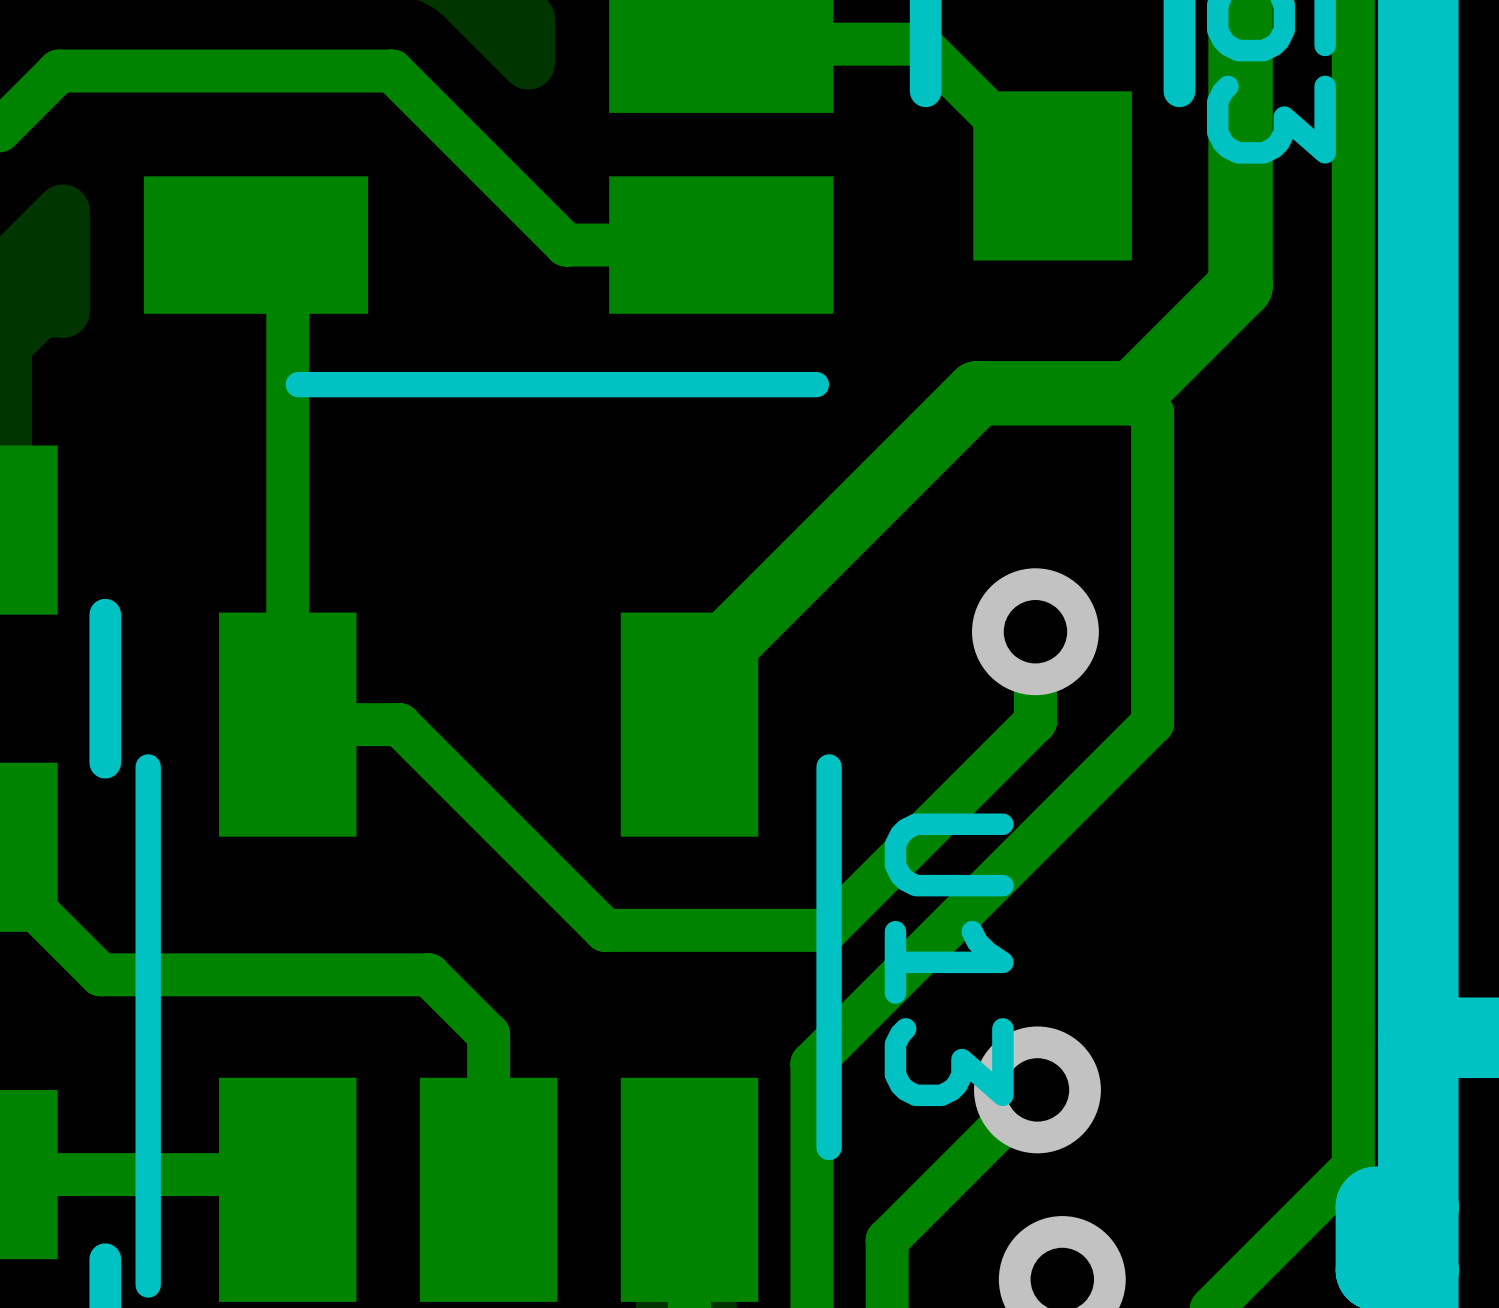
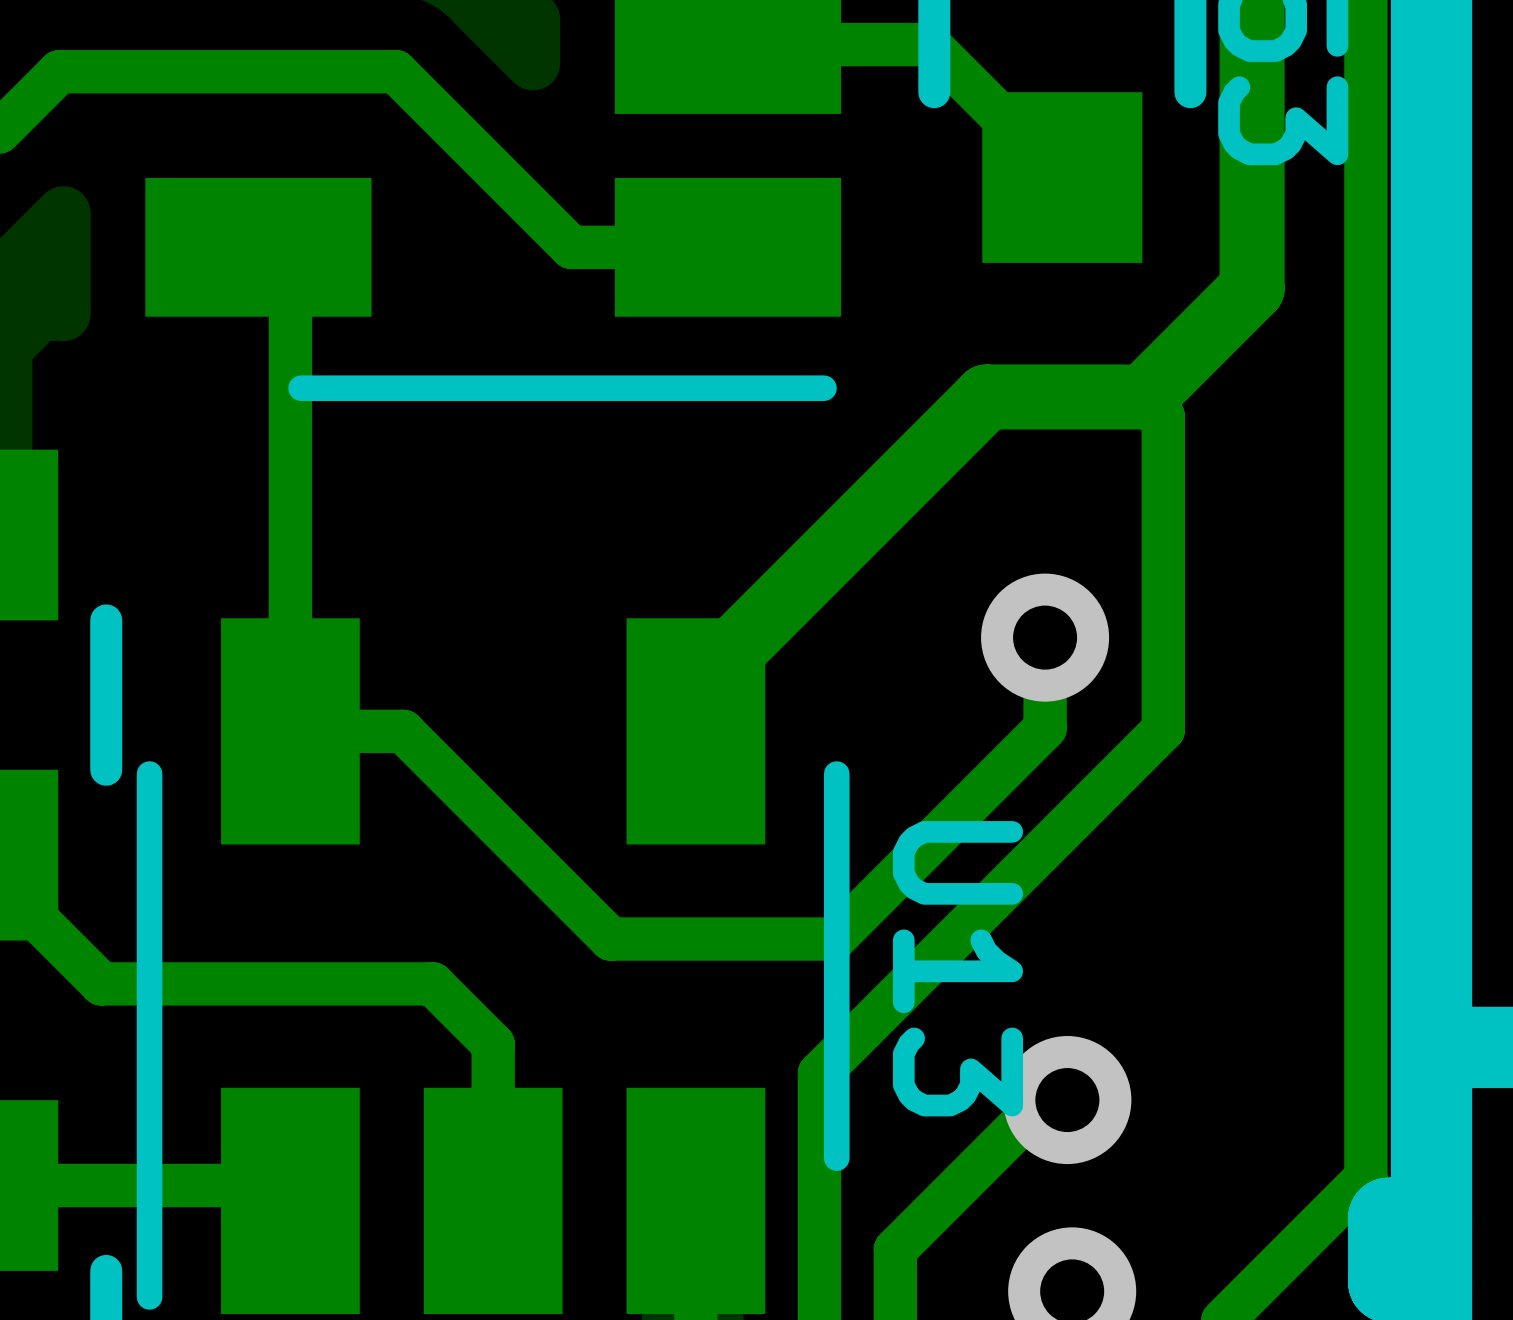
track: (1037, 1089) (887, 1240) -> (1067, 1100) (1045, 1100) (895, 1249)
via position: (1037, 1089) -> (1067, 1100)

